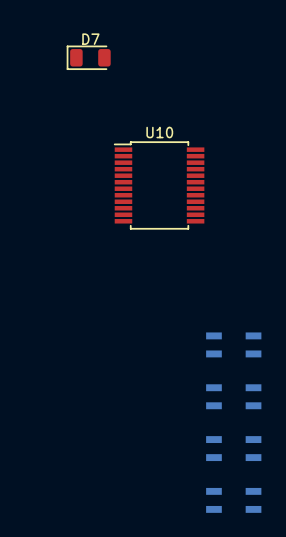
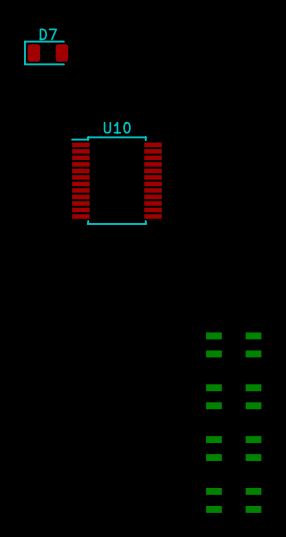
D7 position: (88, 57) -> (46, 52)
U10 position: (159, 185) -> (116, 180)

